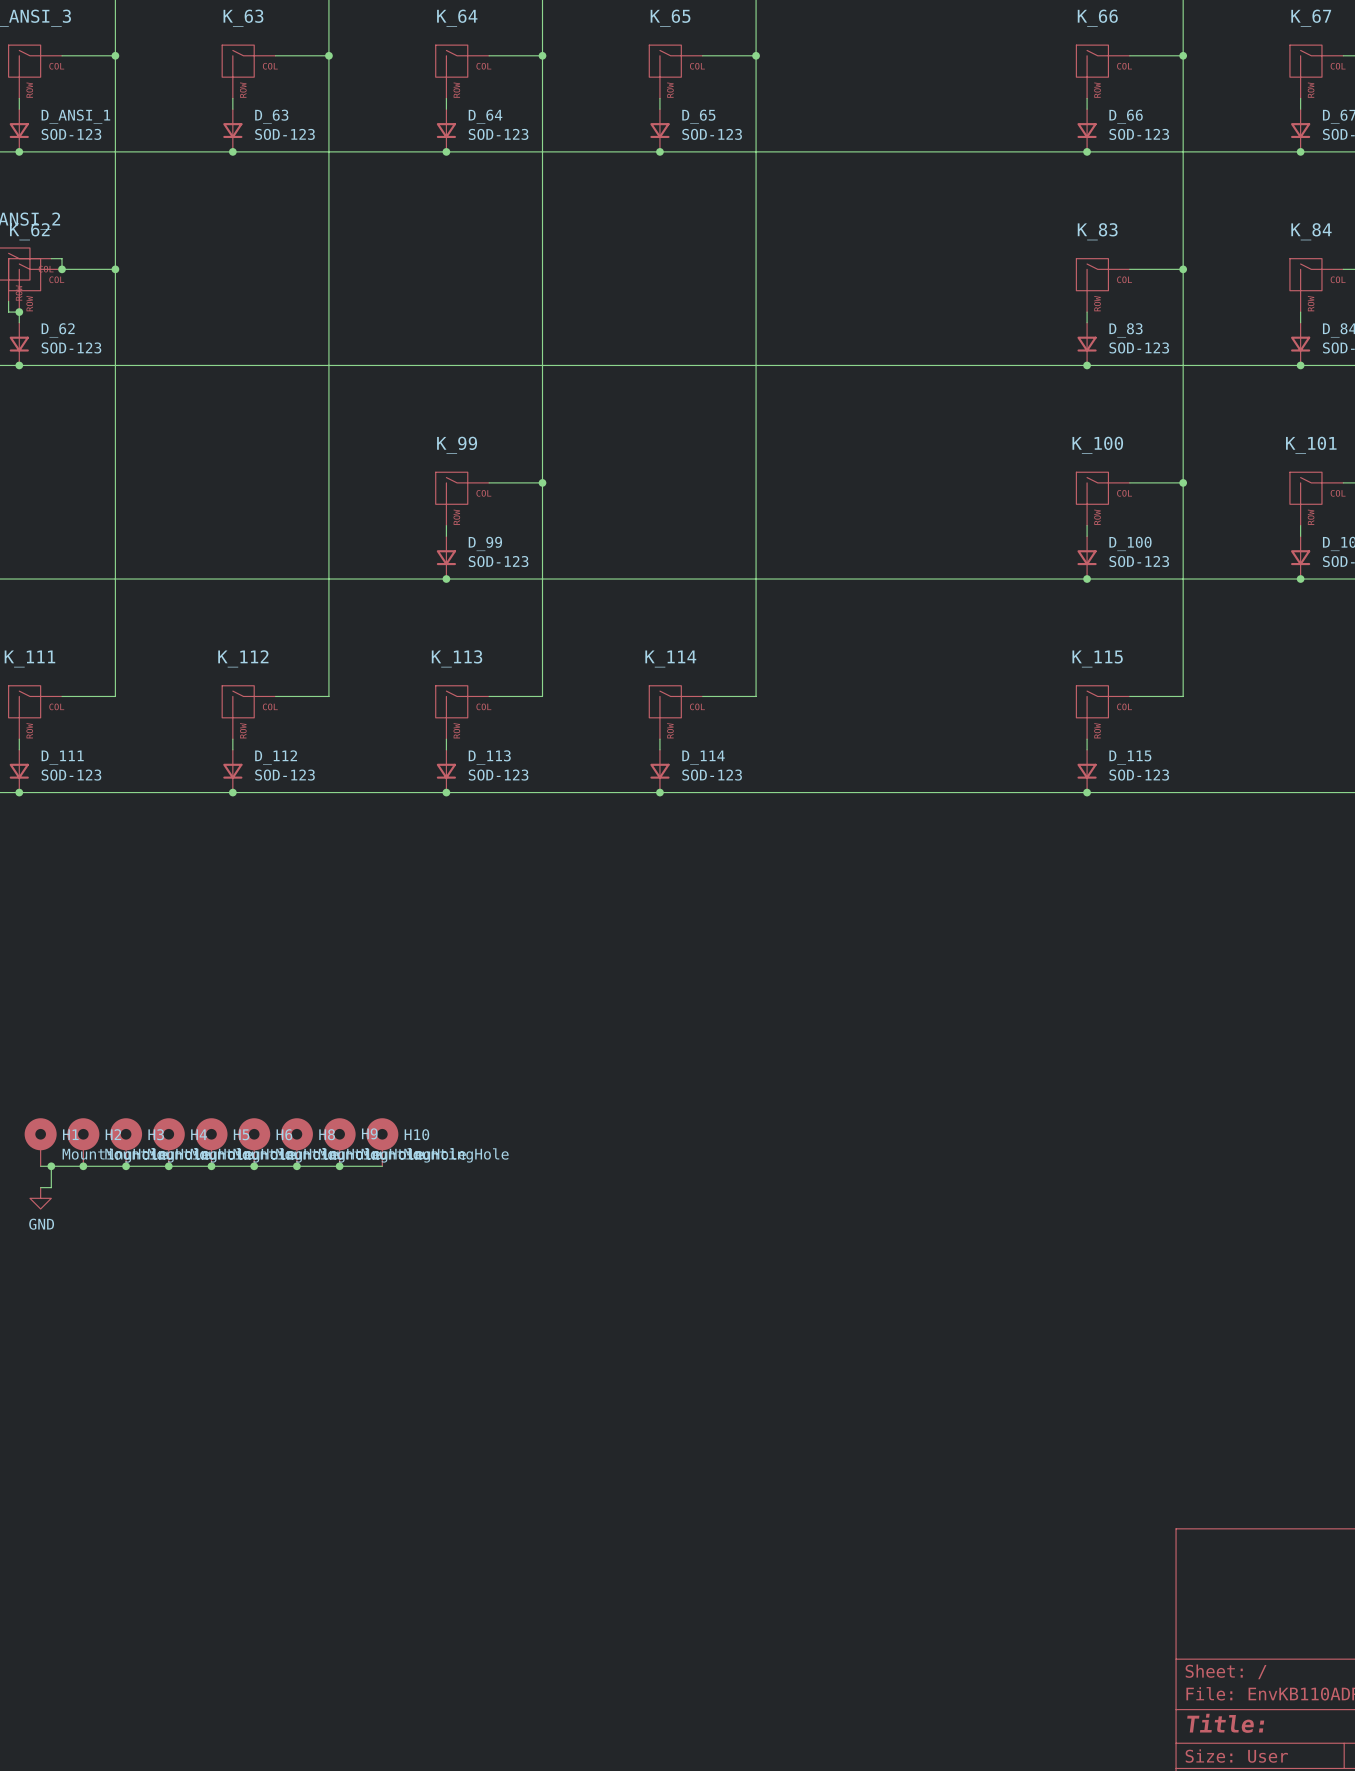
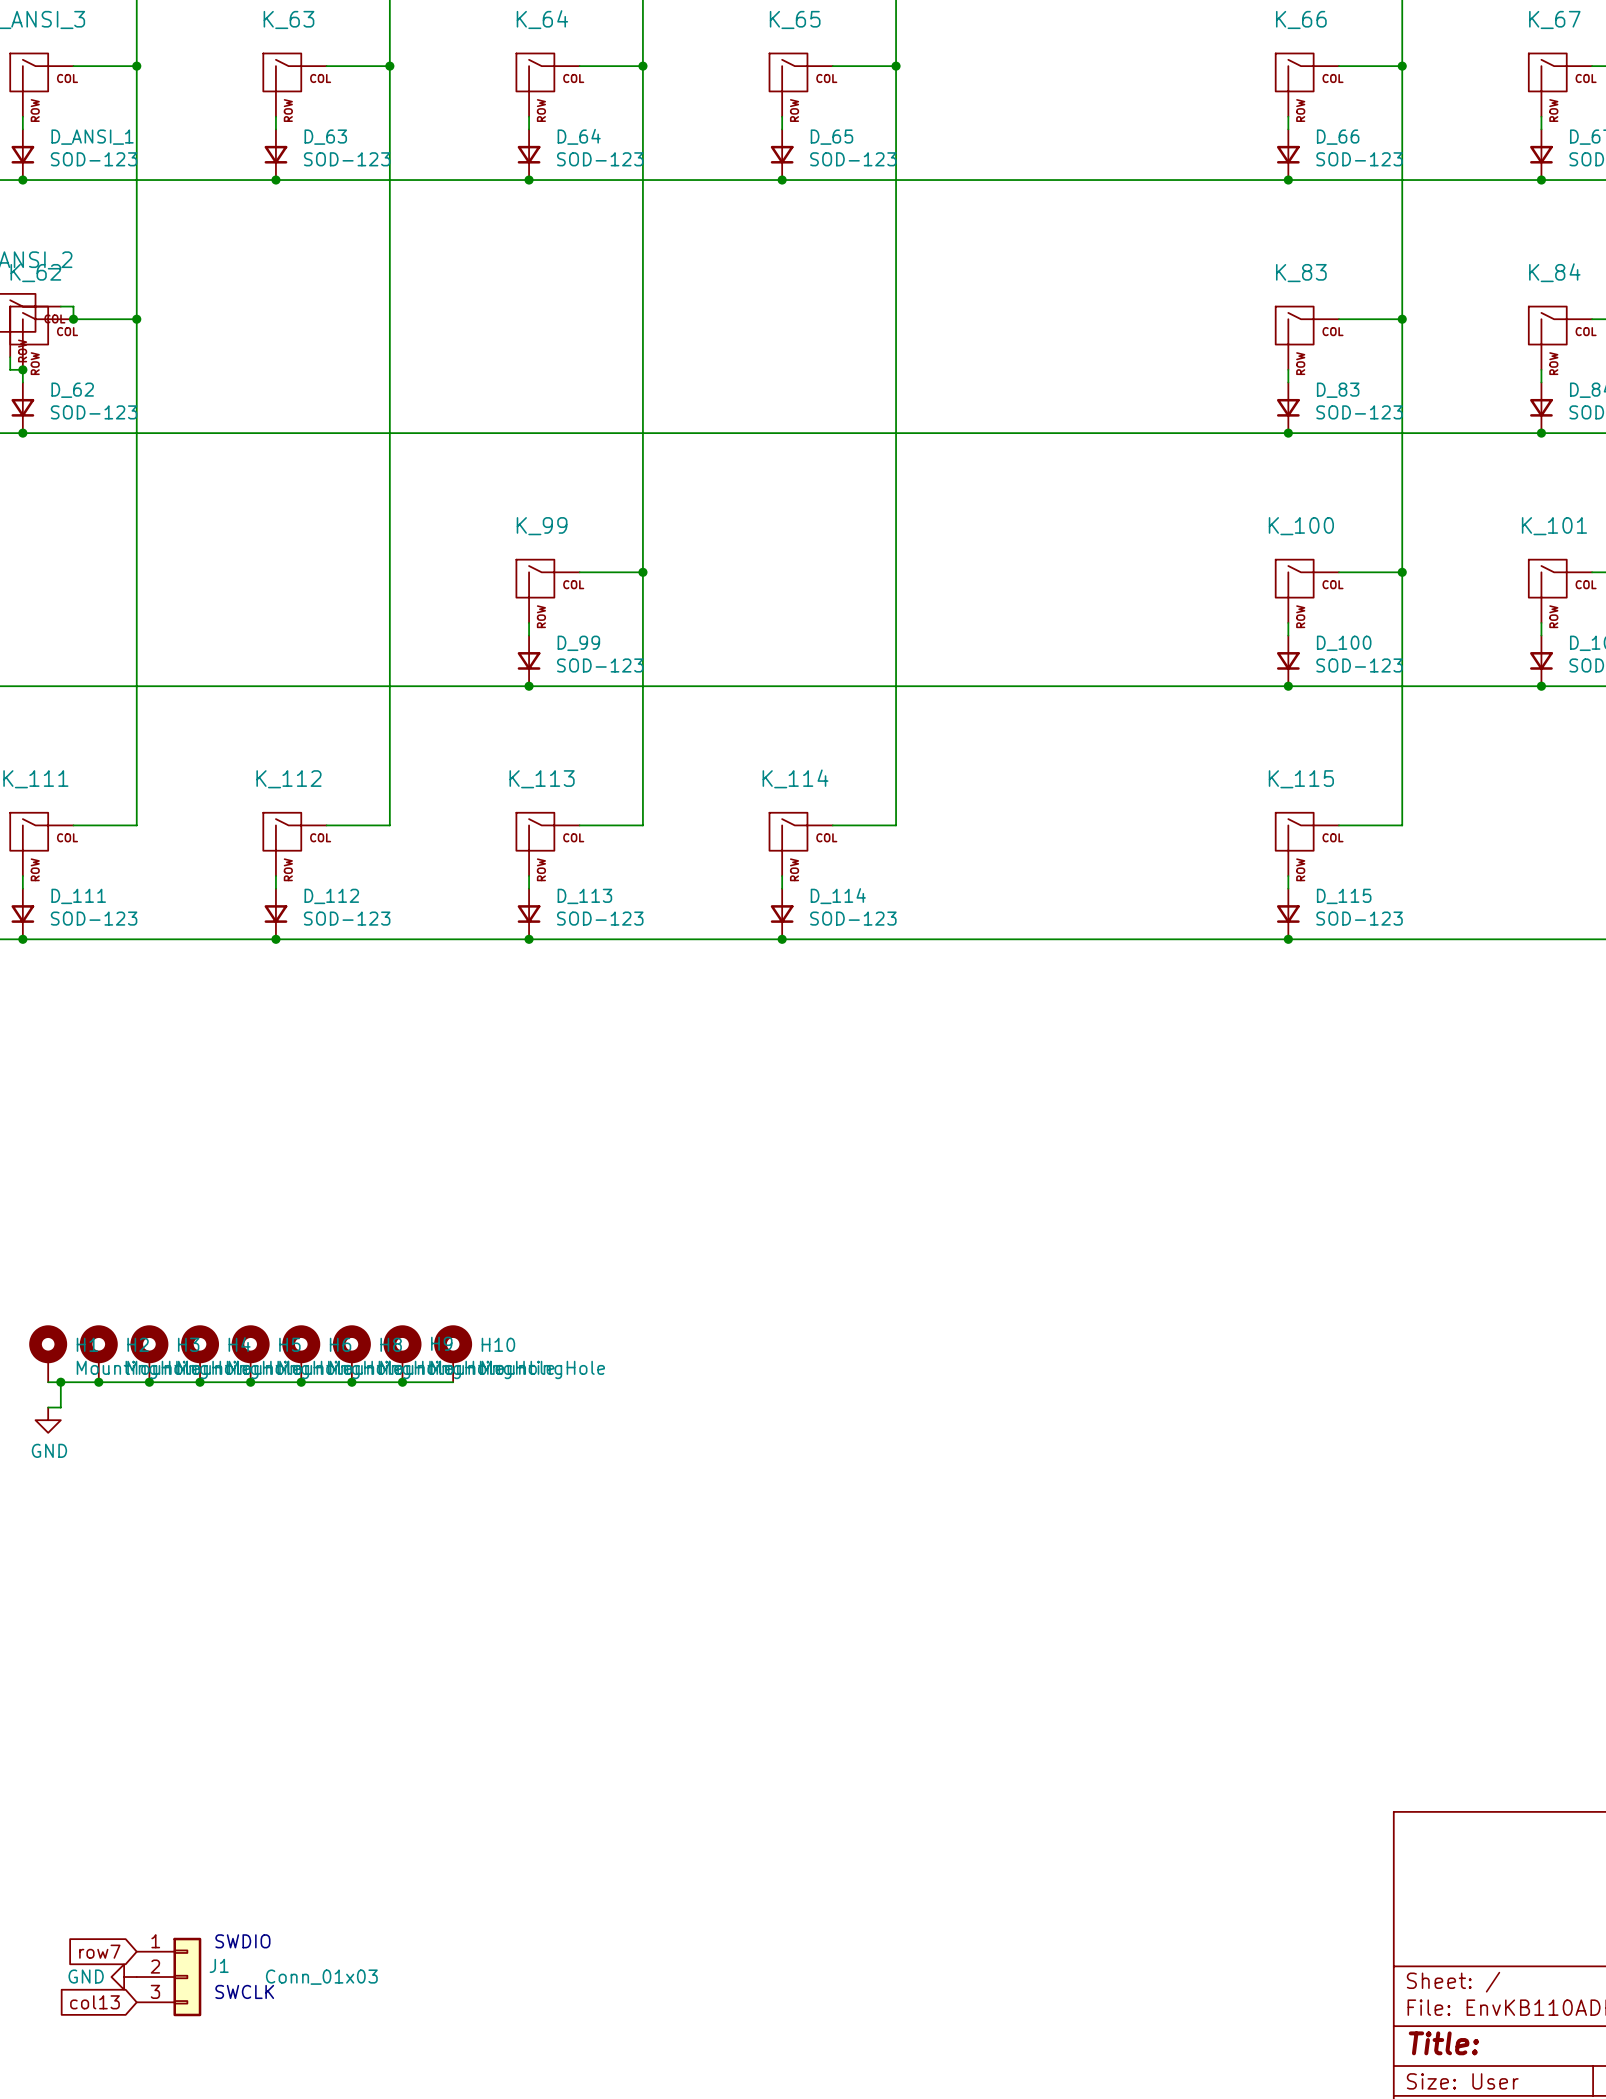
text: none -> SWDIO (242, 1941)
global label: none -> row7 (99, 1951)
power symbol: none -> GND (124, 1977)
J1: none -> Conn_01x03 (169, 1977)
text: none -> SWCLK (244, 1991)
global label: none -> col13 (95, 2002)

